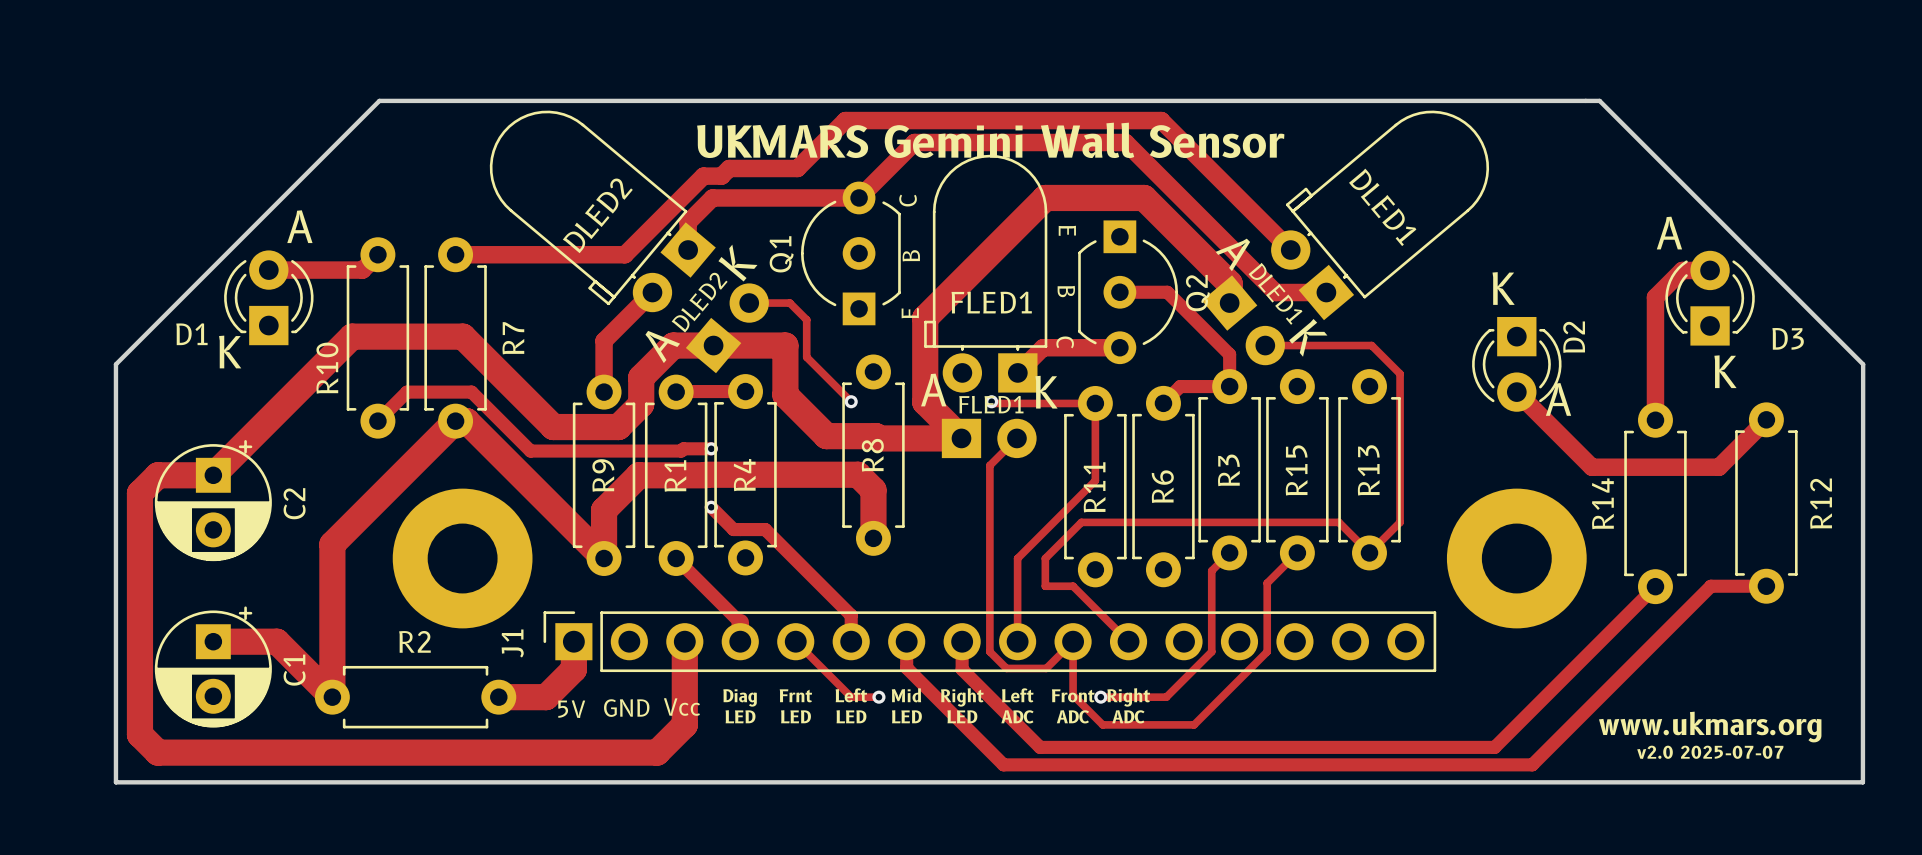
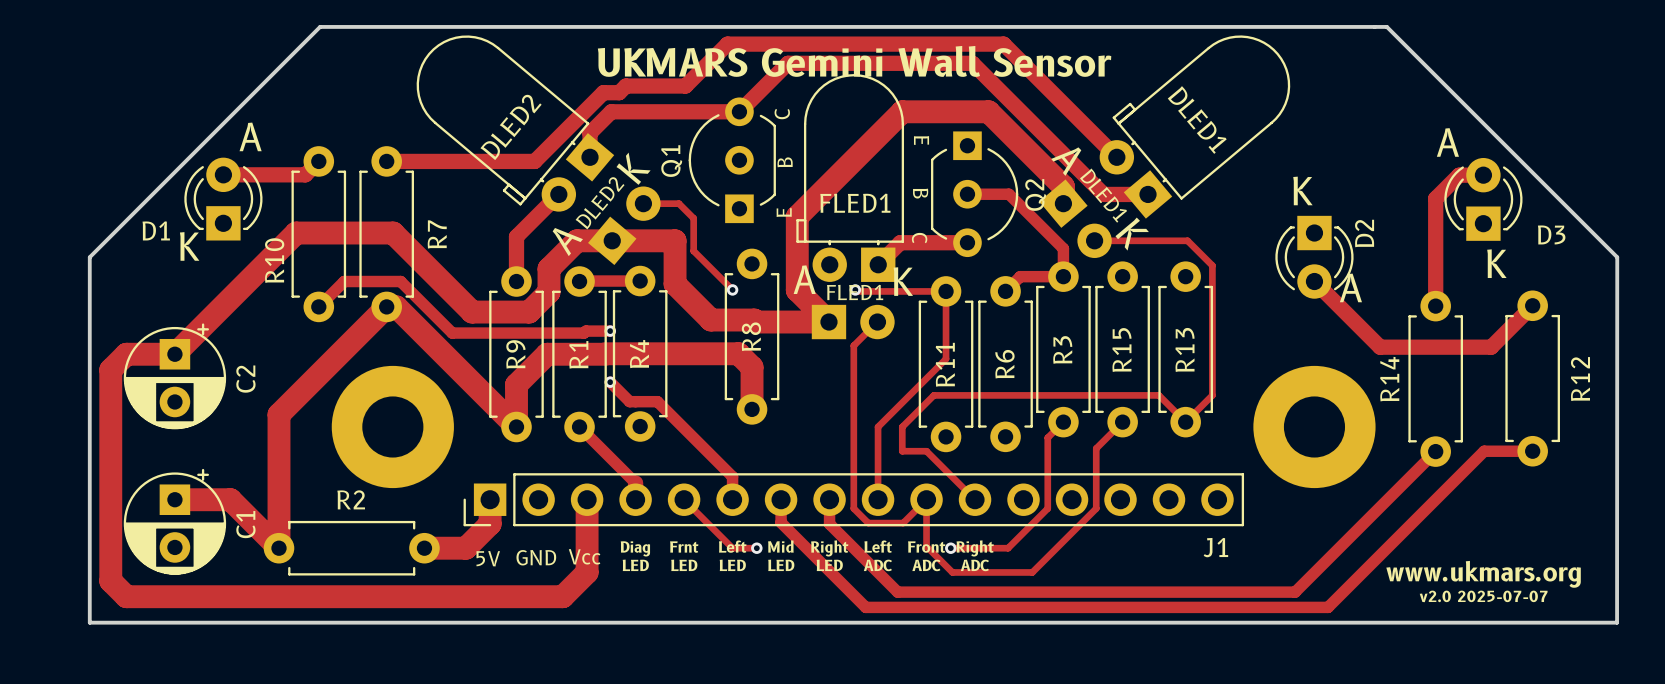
J1 footprint: [543, 611, 1437, 673] -> [463, 473, 1245, 527]
J1 name position: J1 (512, 643) -> J1 (1215, 547)

